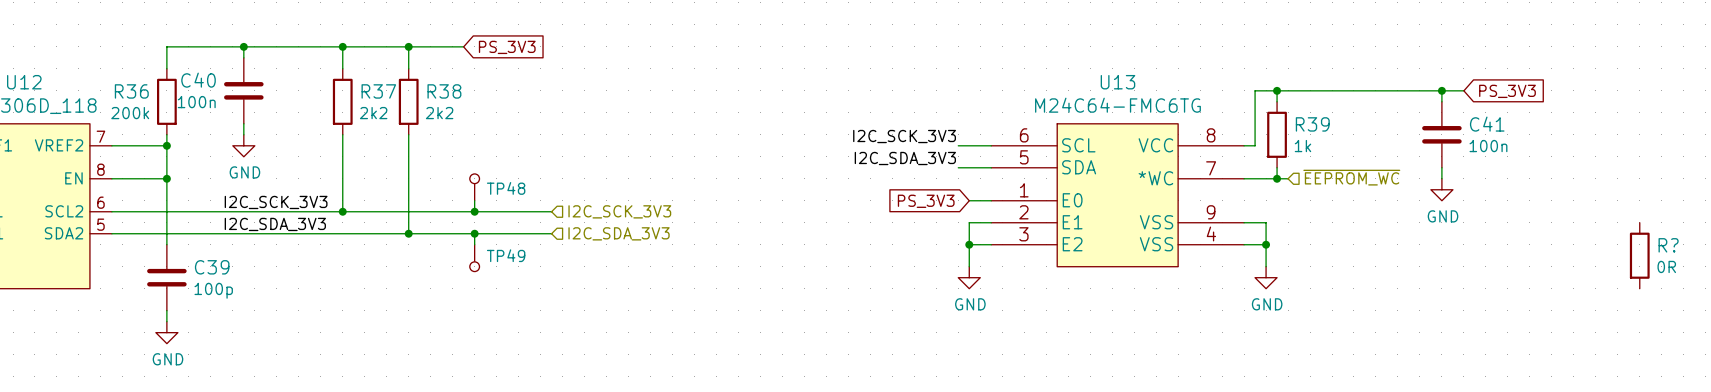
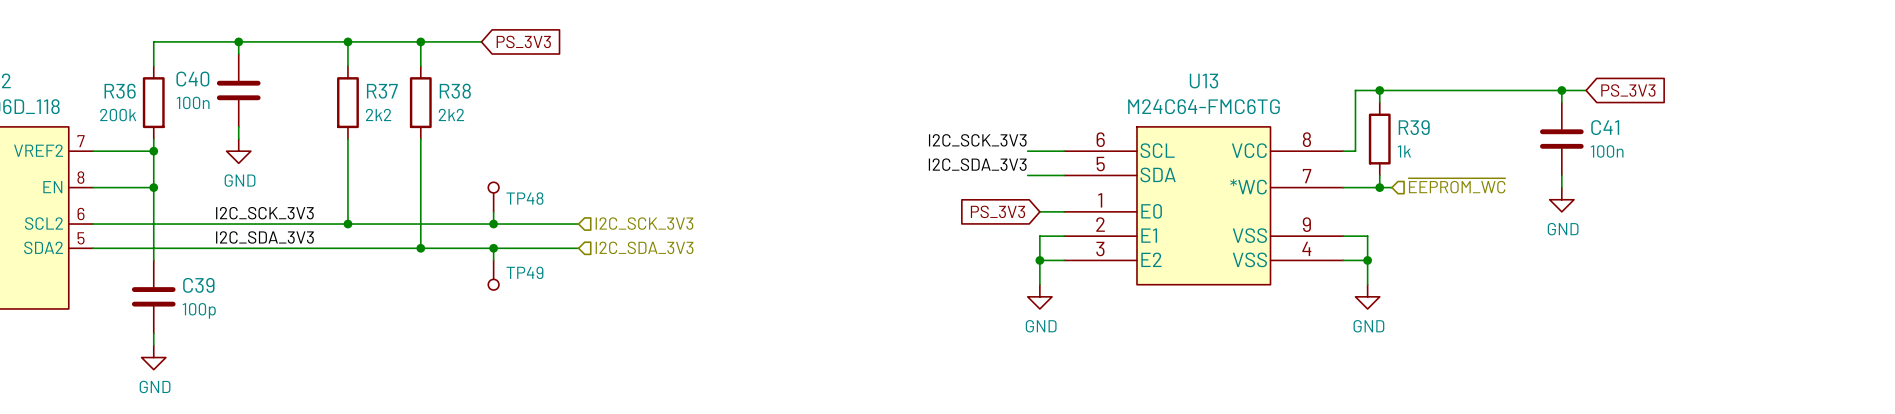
R?: (1639, 255) -> none

